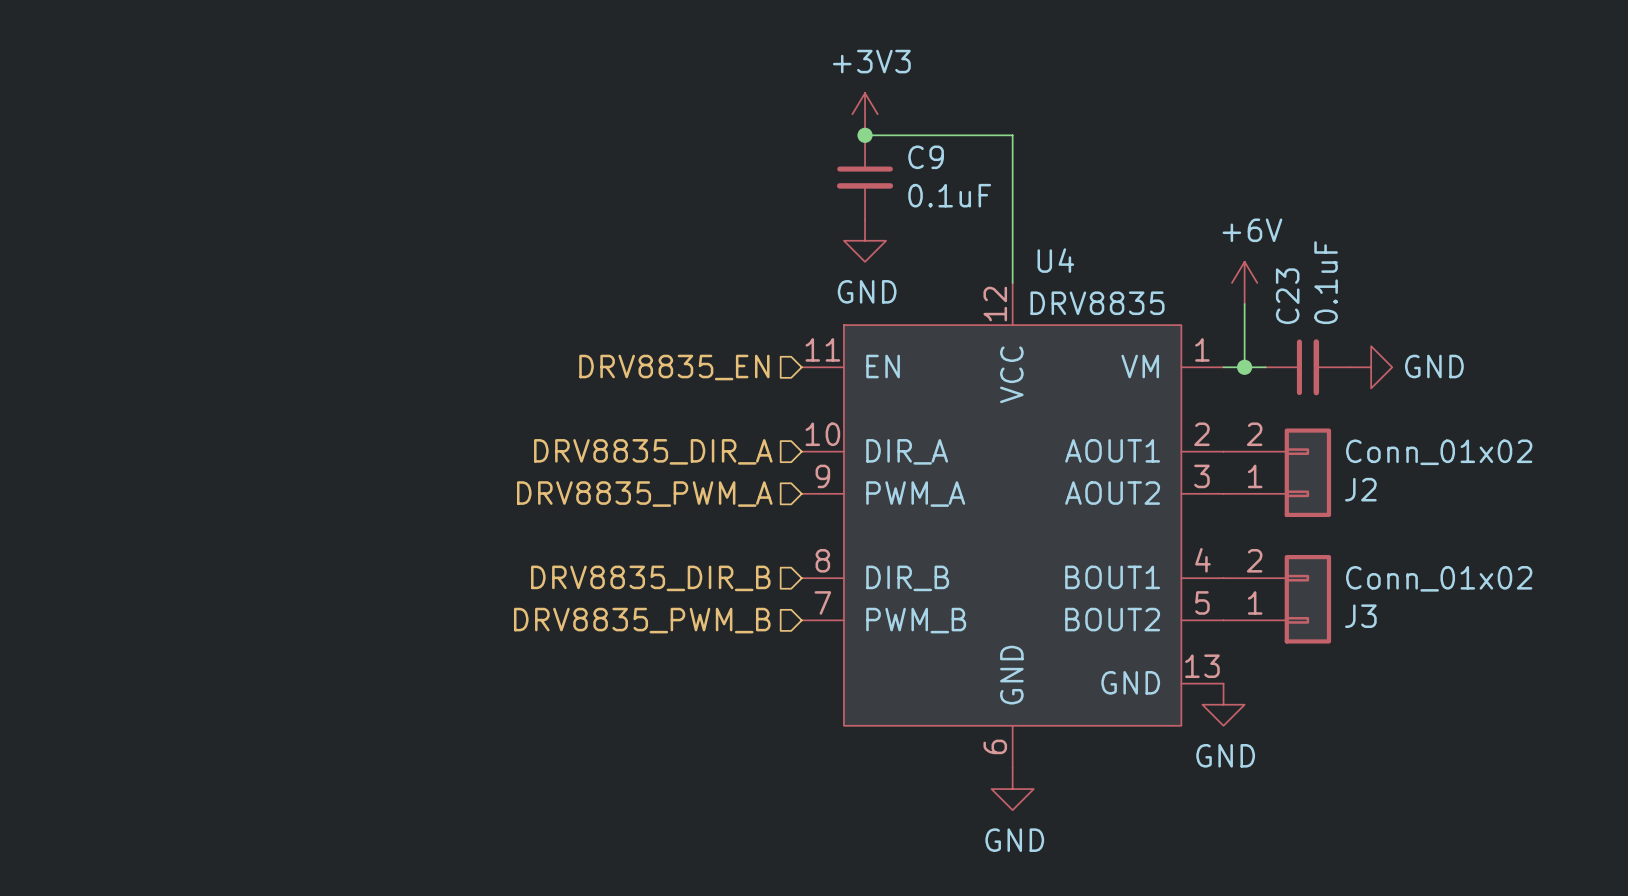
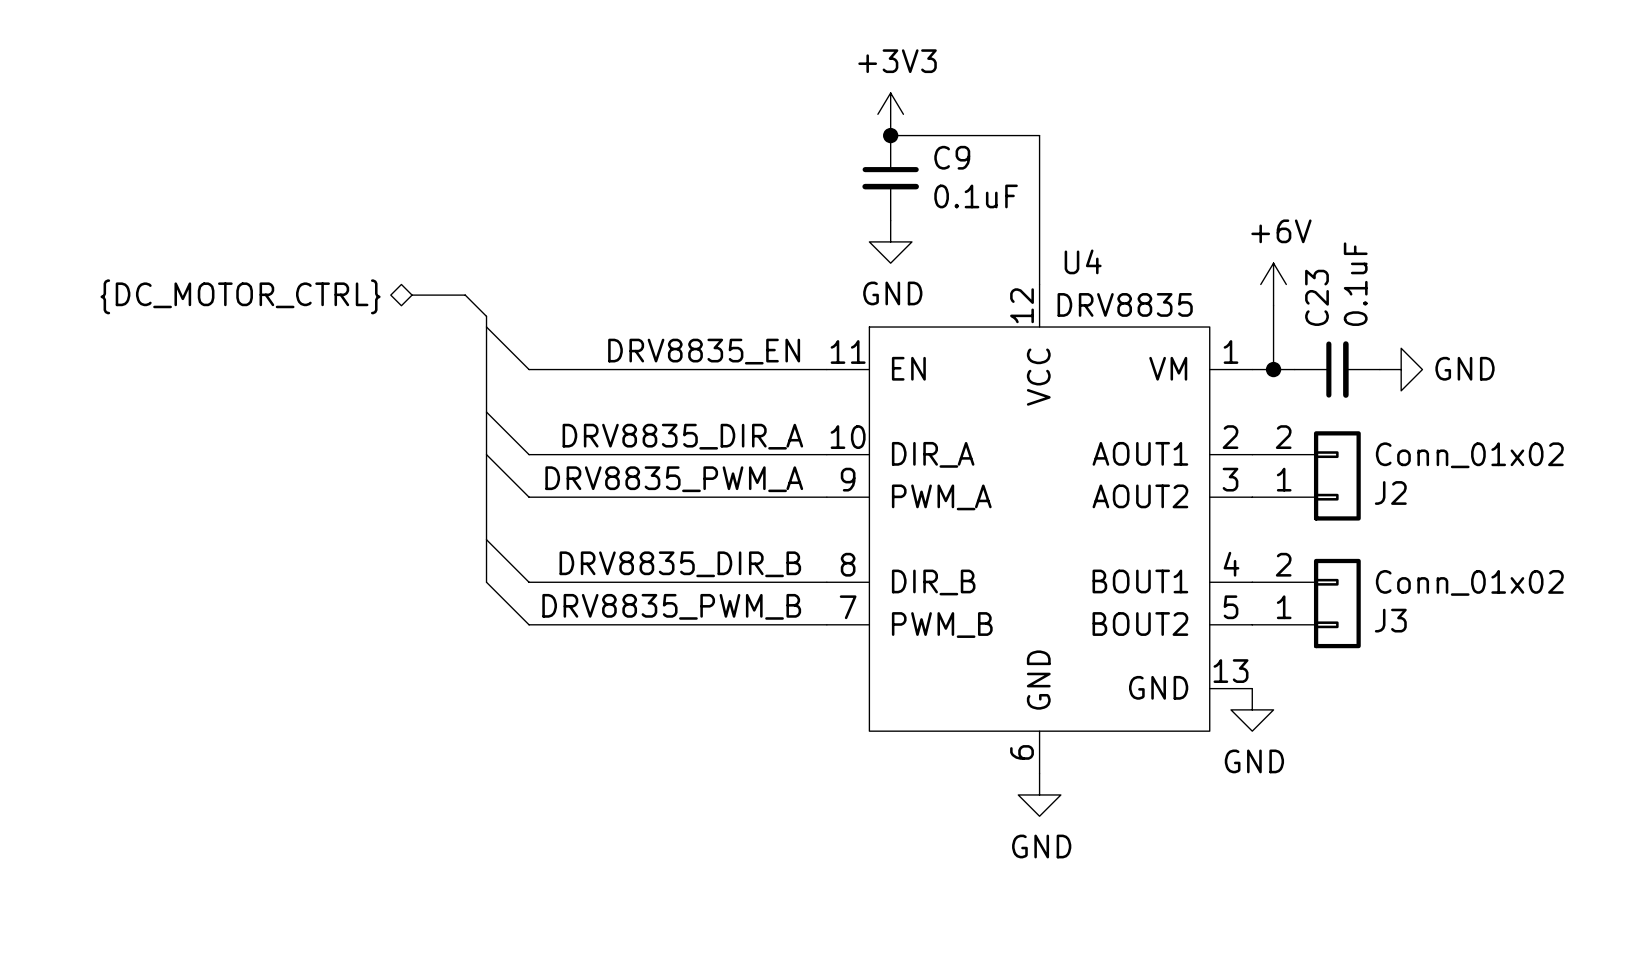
bus: none -> (412, 295) (465, 295) (486, 316) (486, 582)
hierarchical label: none -> {DC_MOTOR_CTRL} (240, 296)
wire: none -> (486, 327) (529, 369) (826, 369)
label: none -> DRV8835_EN (704, 351)
hierarchical label: DRV8835_EN (674, 367) -> none
wire: none -> (486, 412) (529, 454) (826, 454)
label: none -> DRV8835_DIR_A (682, 436)
wire: none -> (486, 454) (529, 497) (826, 497)
hierarchical label: DRV8835_DIR_A (653, 451) -> none
label: none -> DRV8835_PWM_A (674, 479)
hierarchical label: DRV8835_PWM_A (644, 494) -> none
wire: none -> (486, 539) (529, 582) (826, 582)
label: none -> DRV8835_DIR_B (680, 564)
wire: none -> (486, 582) (529, 624) (826, 624)
hierarchical label: DRV8835_DIR_B (650, 578) -> none
label: none -> DRV8835_PWM_B (671, 606)
hierarchical label: DRV8835_PWM_B (642, 620) -> none

